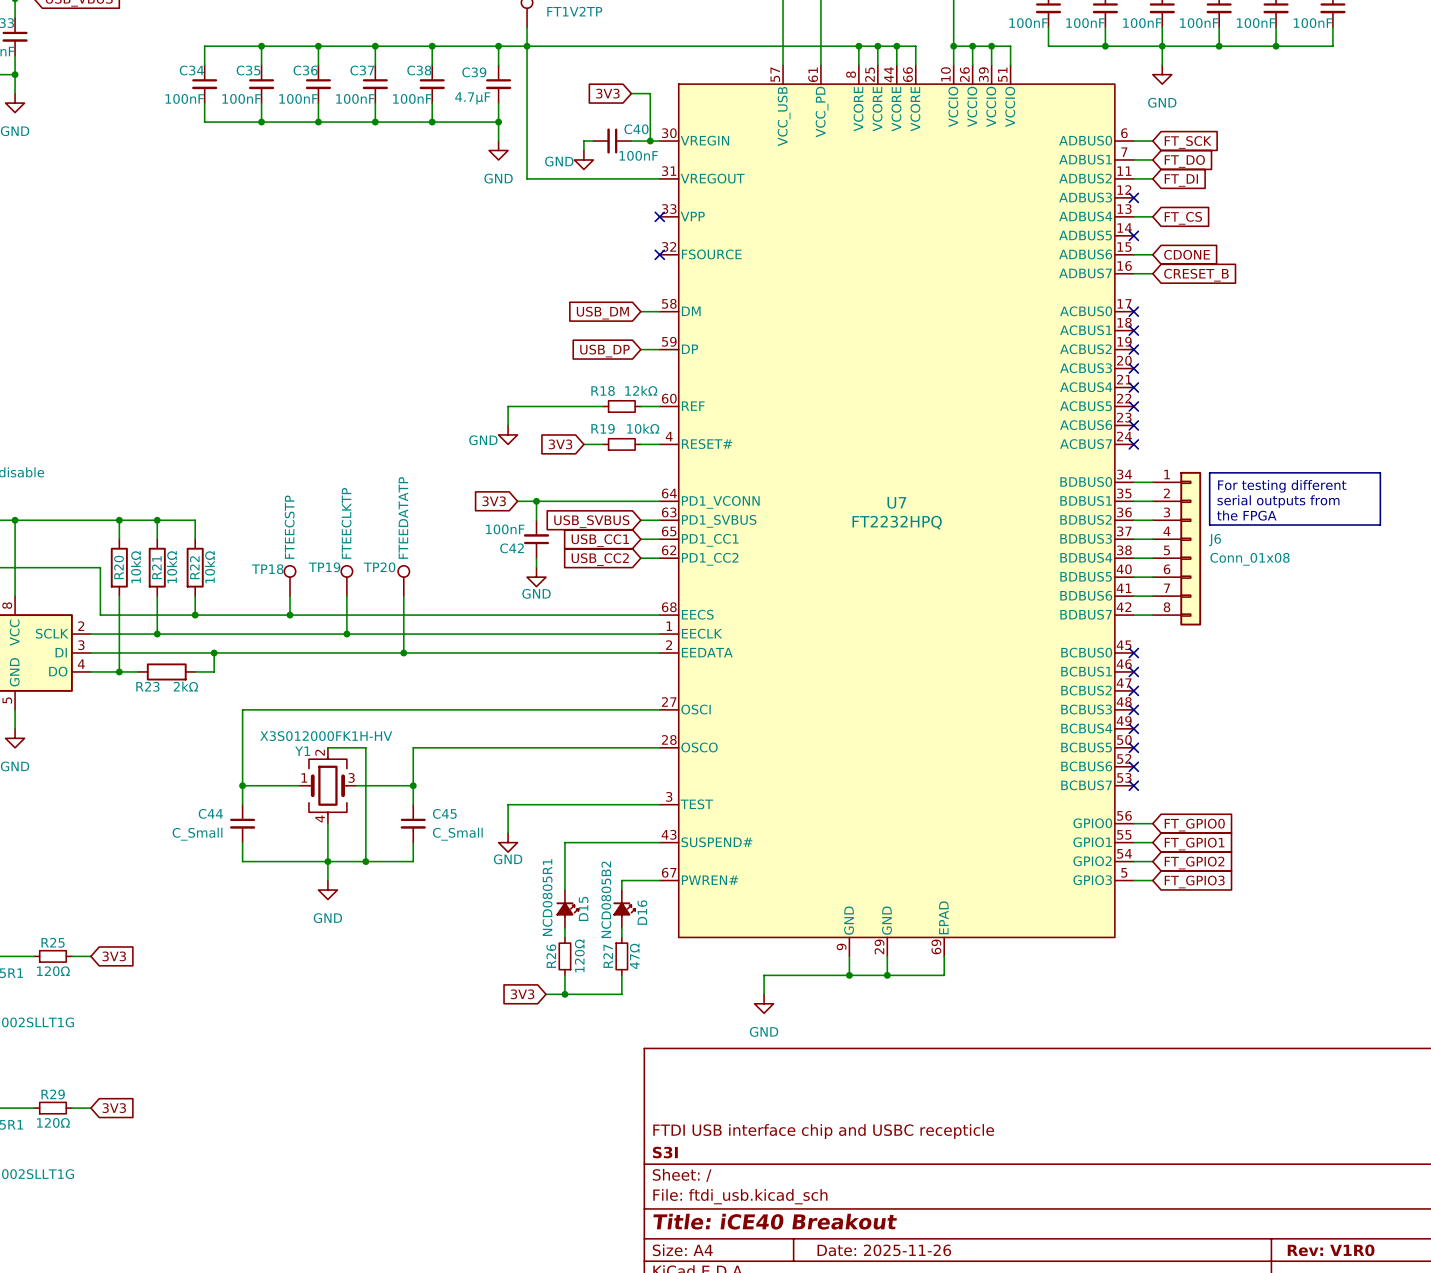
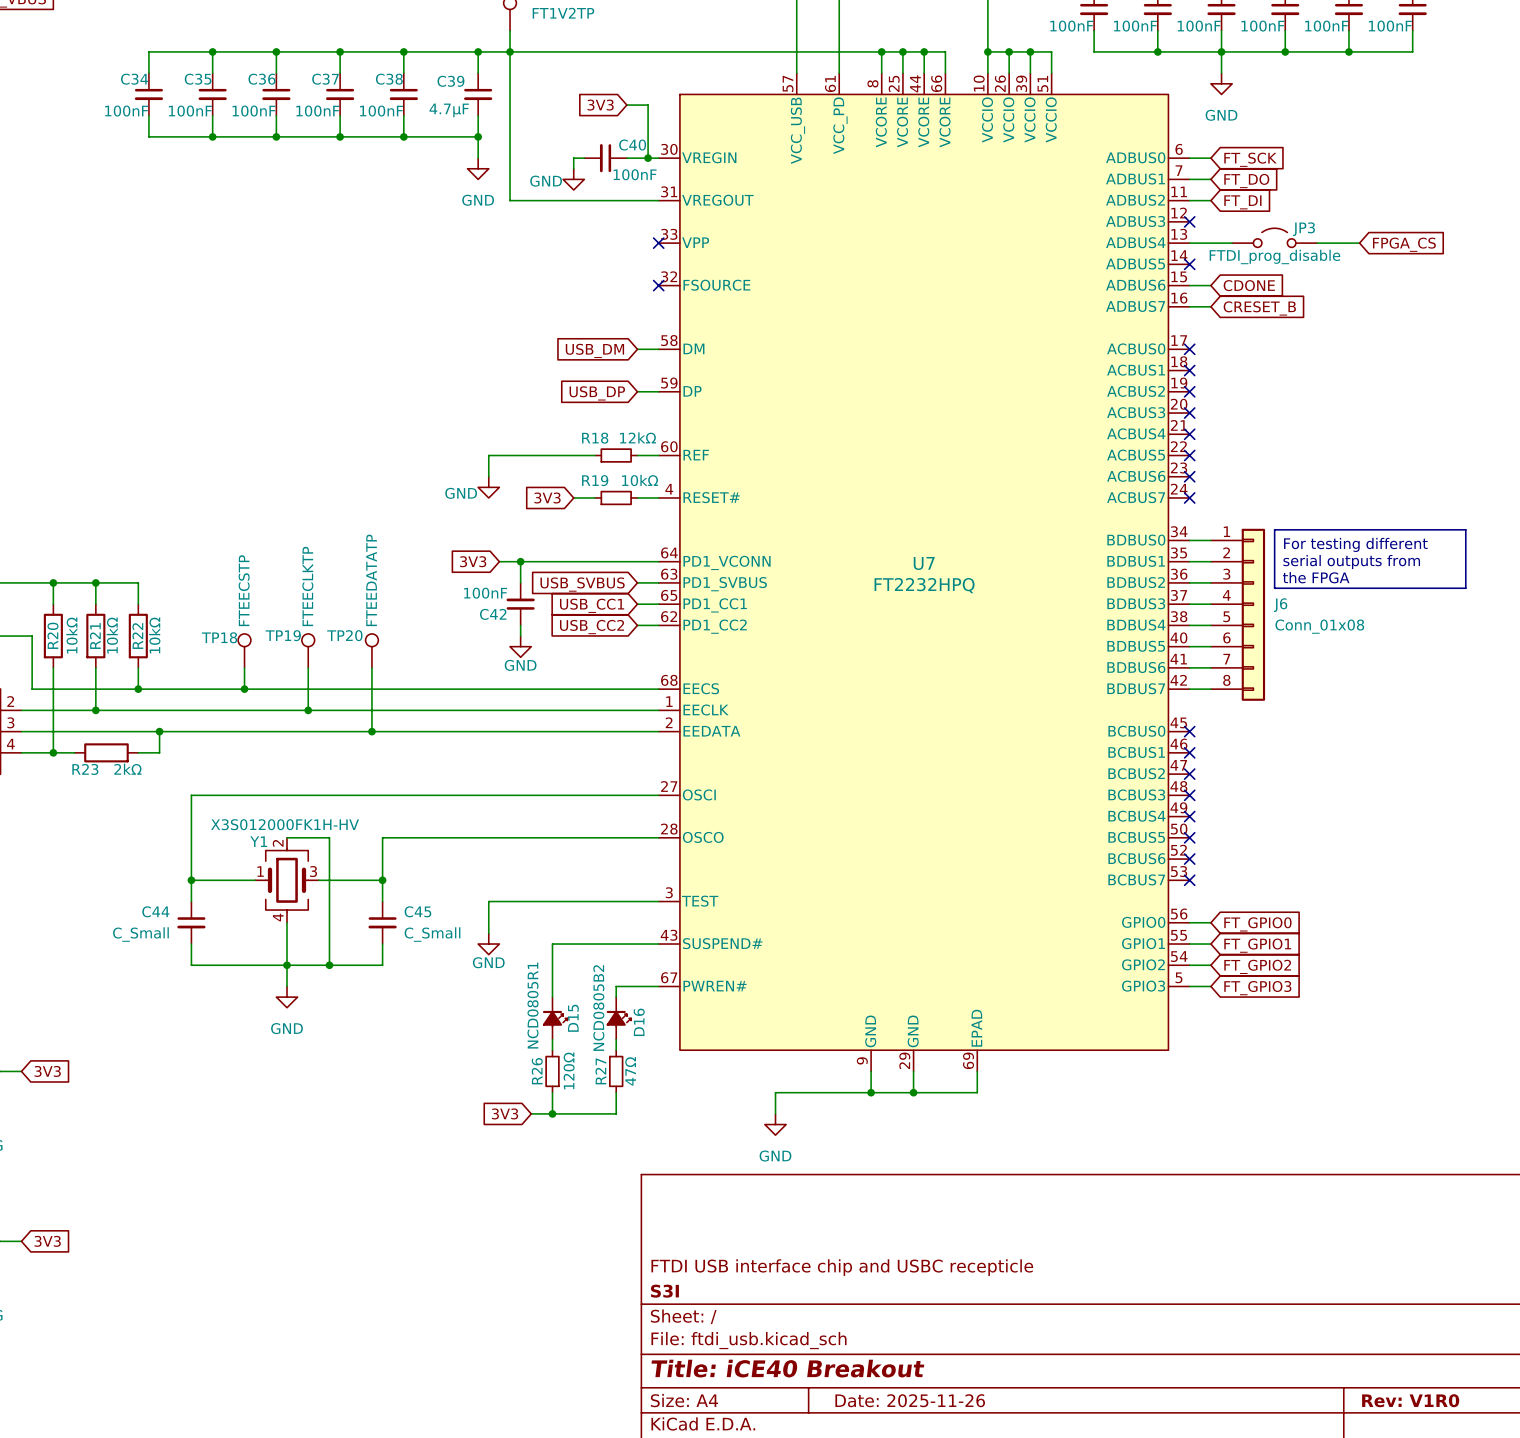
JP3: none -> FTDI_prog_disable (1274, 237)
wire: none -> (1210, 243) (1232, 243)
wire: none -> (1317, 243) (1359, 243)
global label: FT_CS (1183, 218) -> none
global label: none -> FPGA_CS (1404, 244)

